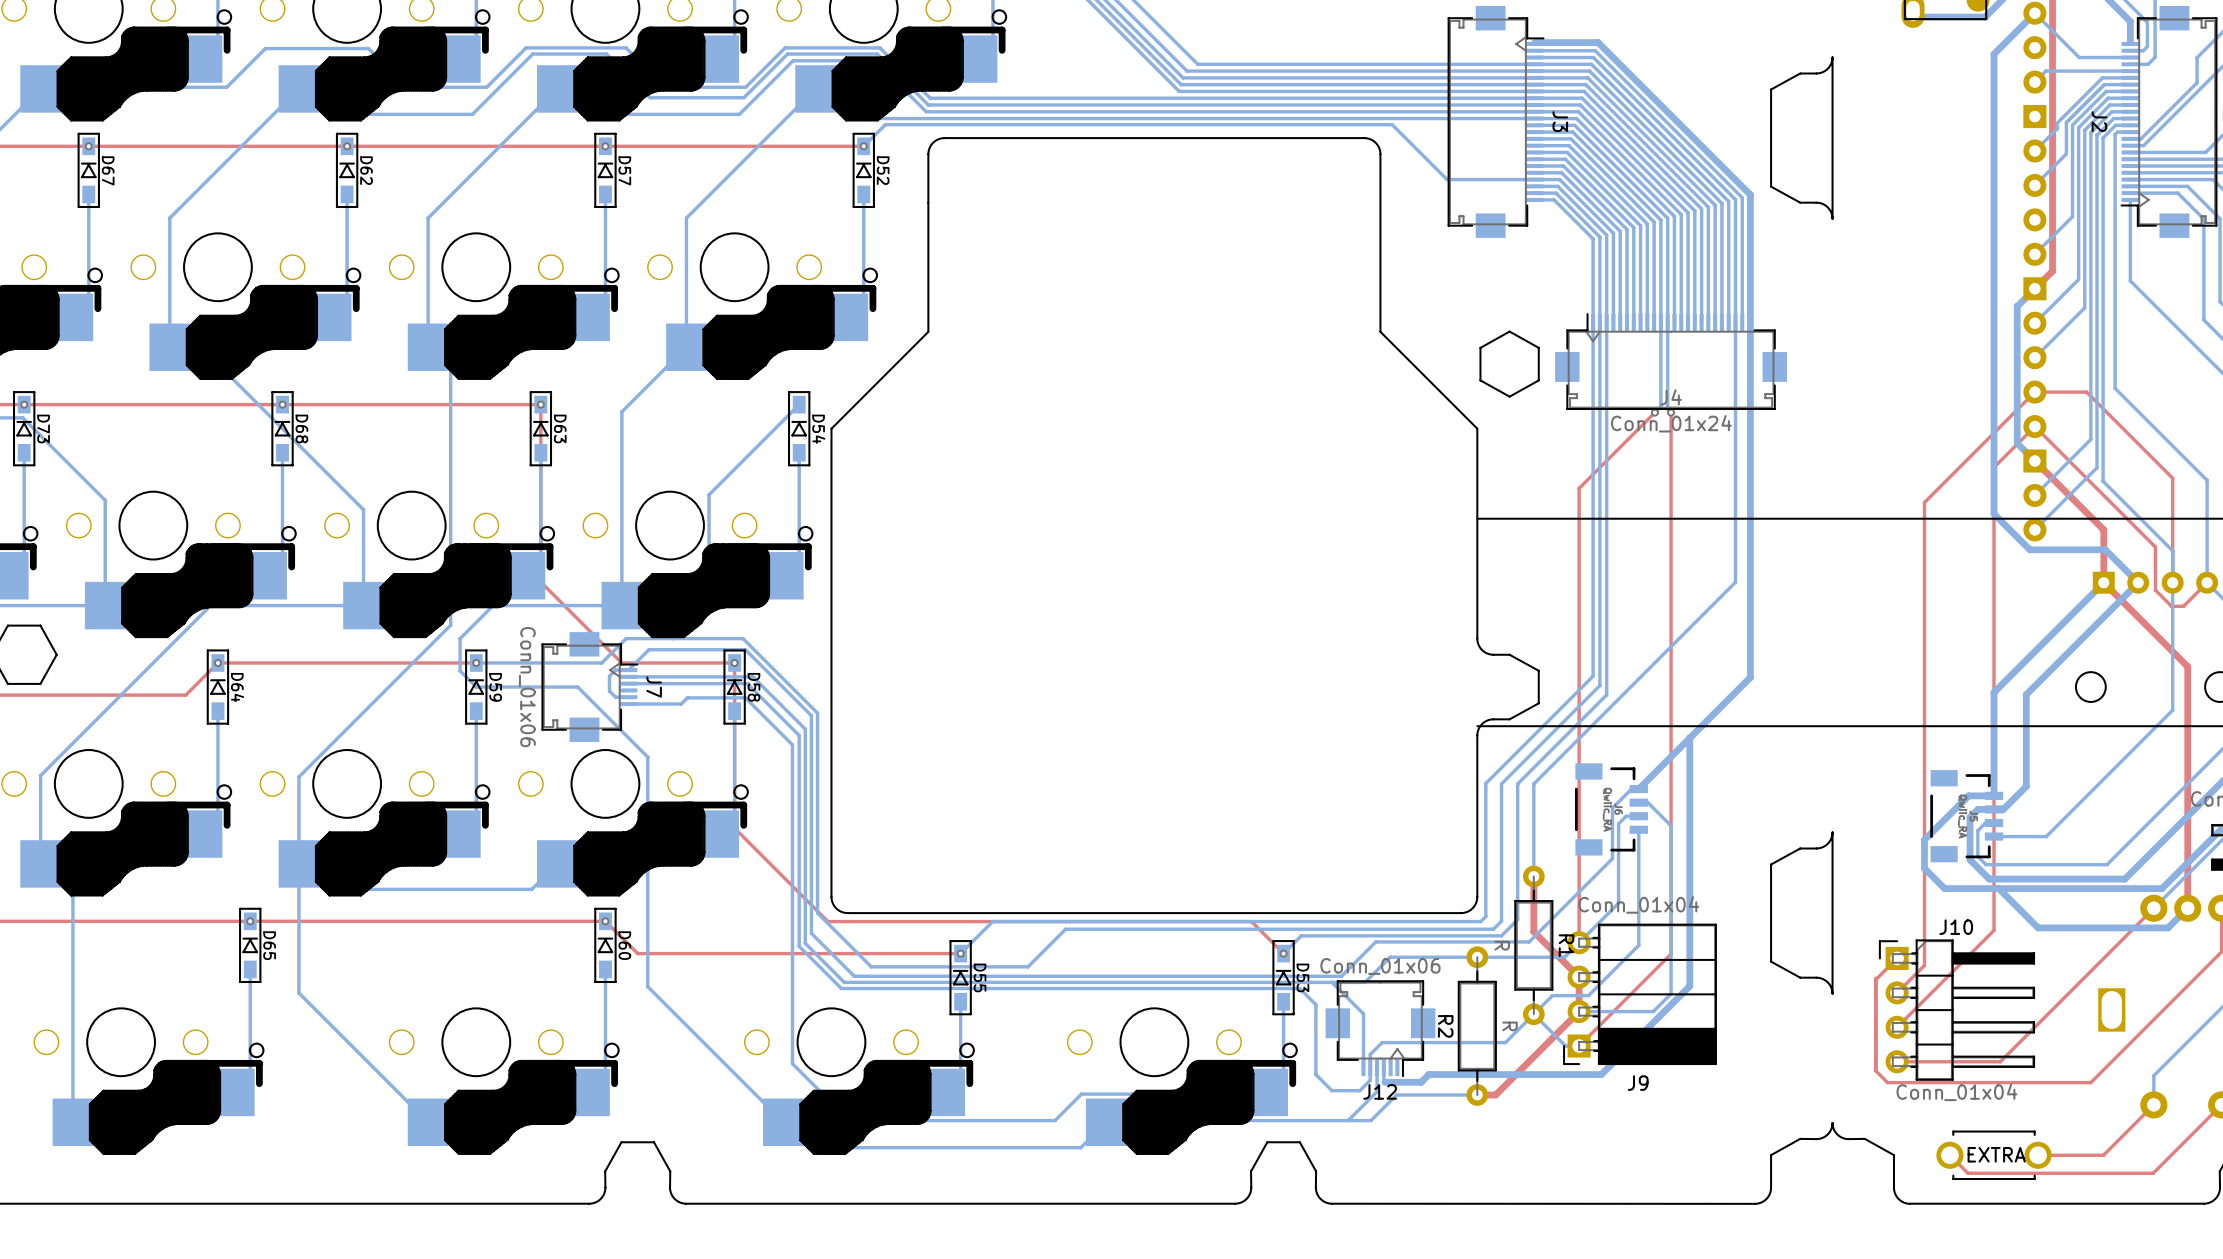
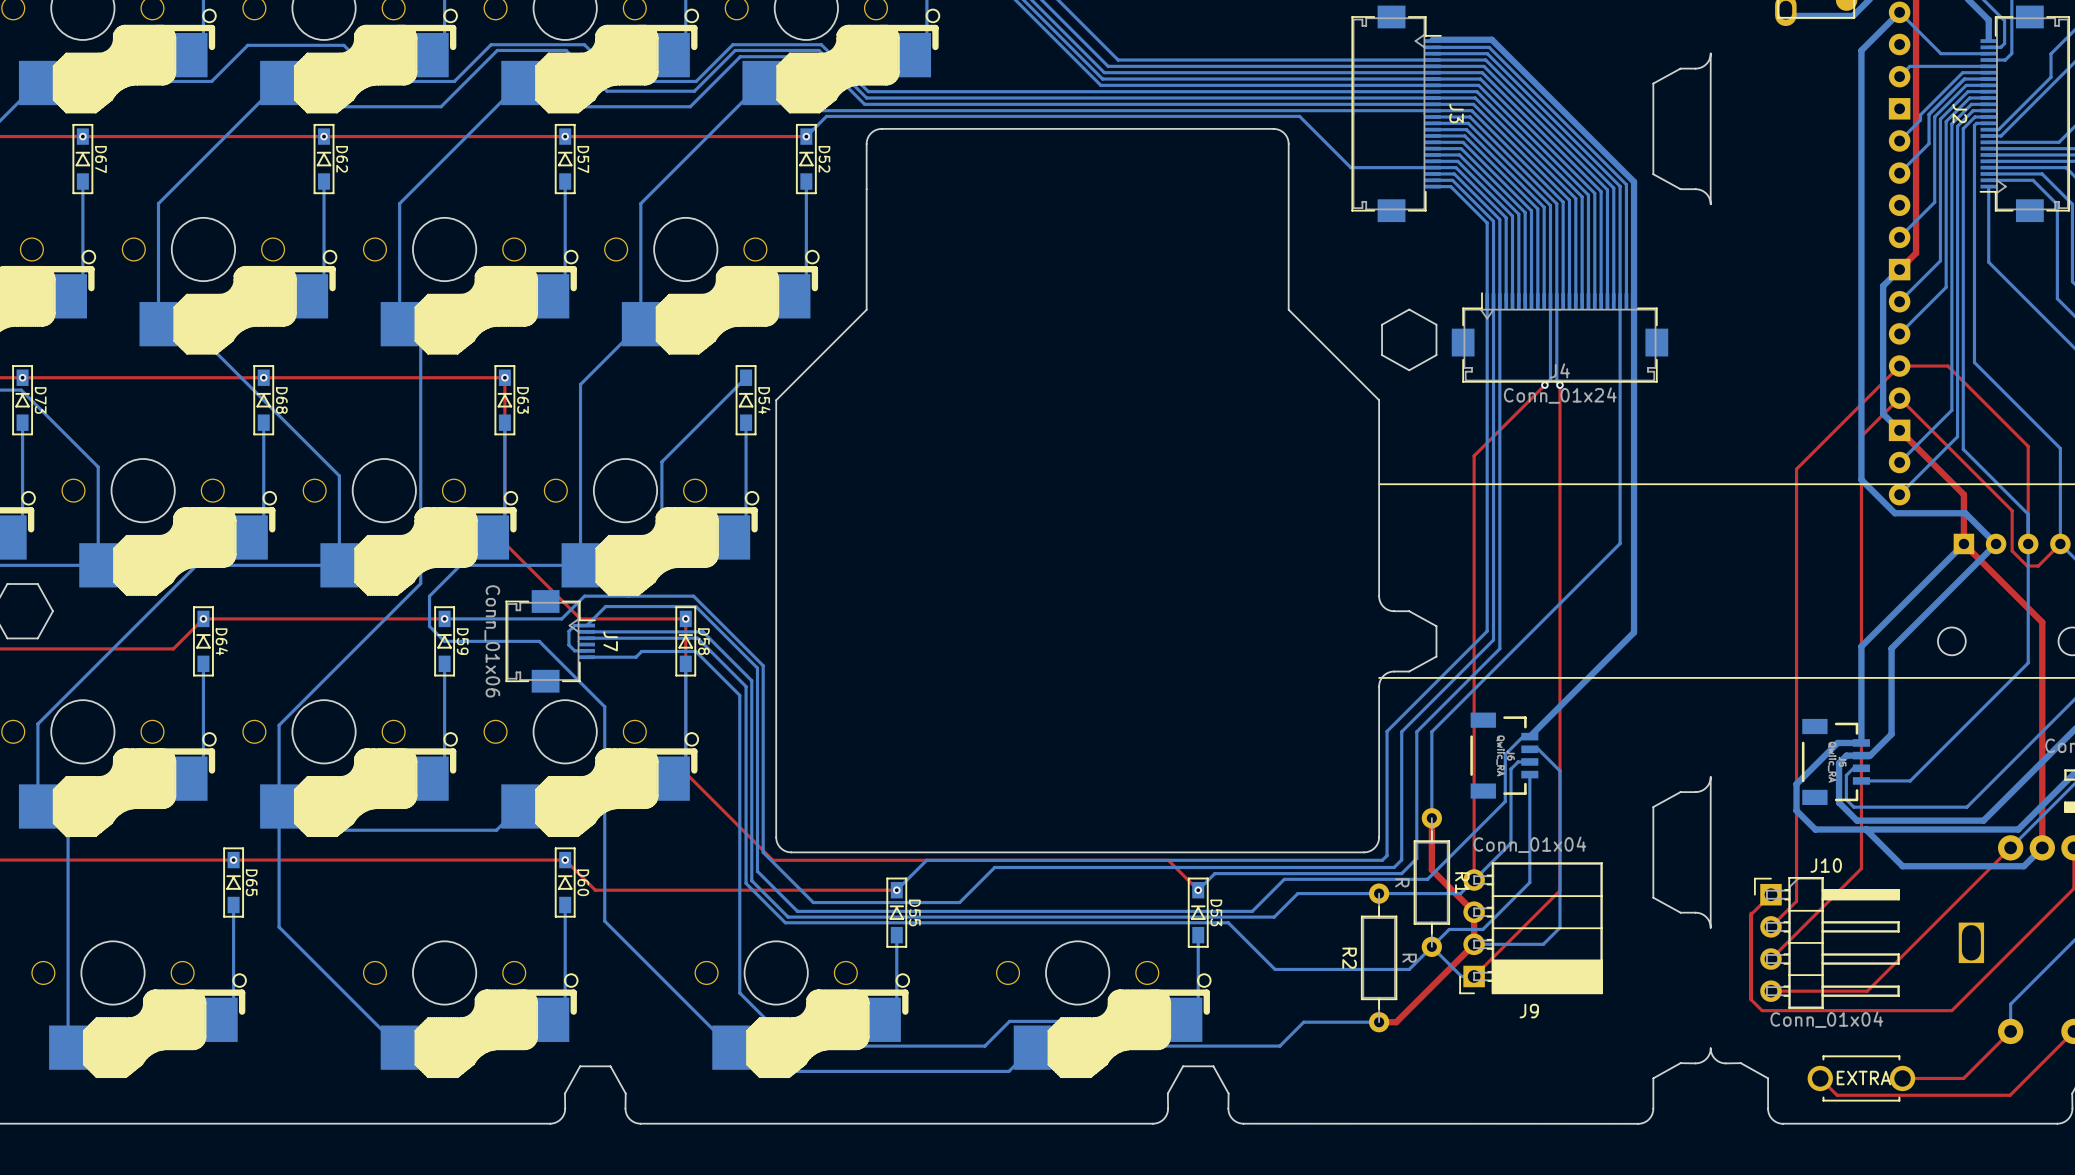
bottom track: (1689, 738) (1689, 986) (1601, 1074) (1428, 1074) (1421, 1082) (1384, 1082) (1383, 1067) -> none
bottom track: (1332, 982) (1363, 1013) (1363, 1067) -> none
bottom track: (1299, 988) (1315, 1004) (1315, 1074) (1332, 1090) (1359, 1090) (1370, 1080) (1370, 1054) (1382, 1042) (1505, 1042) (1509, 1038) -> (1213, 922) (1228, 922) (1275, 969) (1409, 969)
J12: Conn_01x06 (1380, 1028) -> none
bottom track: (1377, 1067) (1377, 1091) (1348, 1120) -> none

